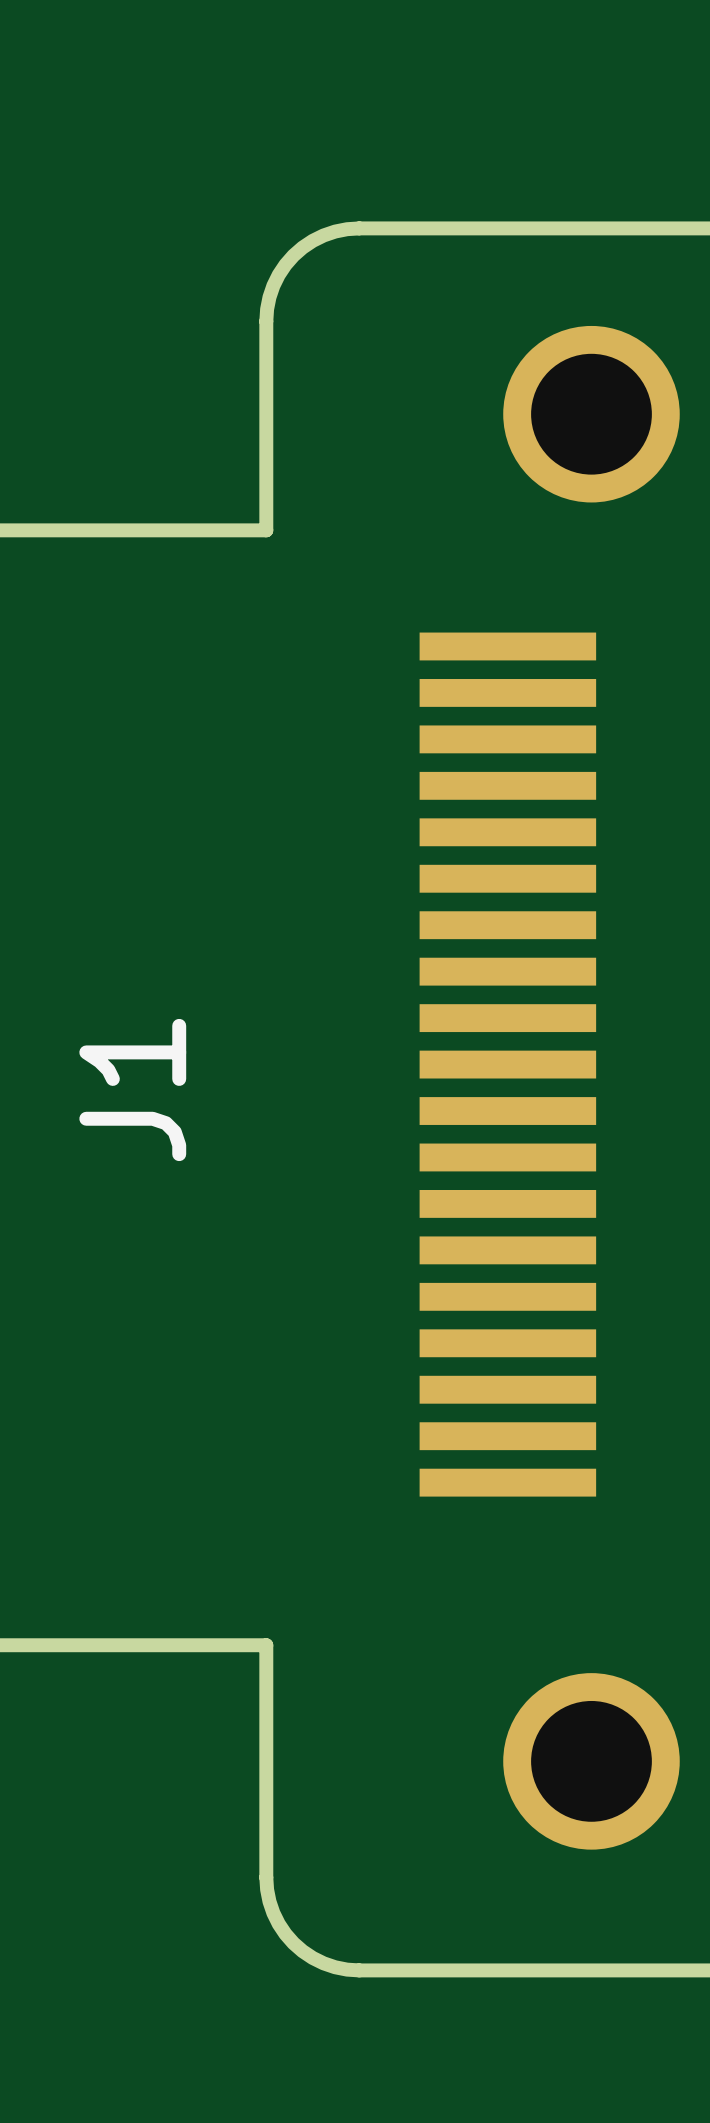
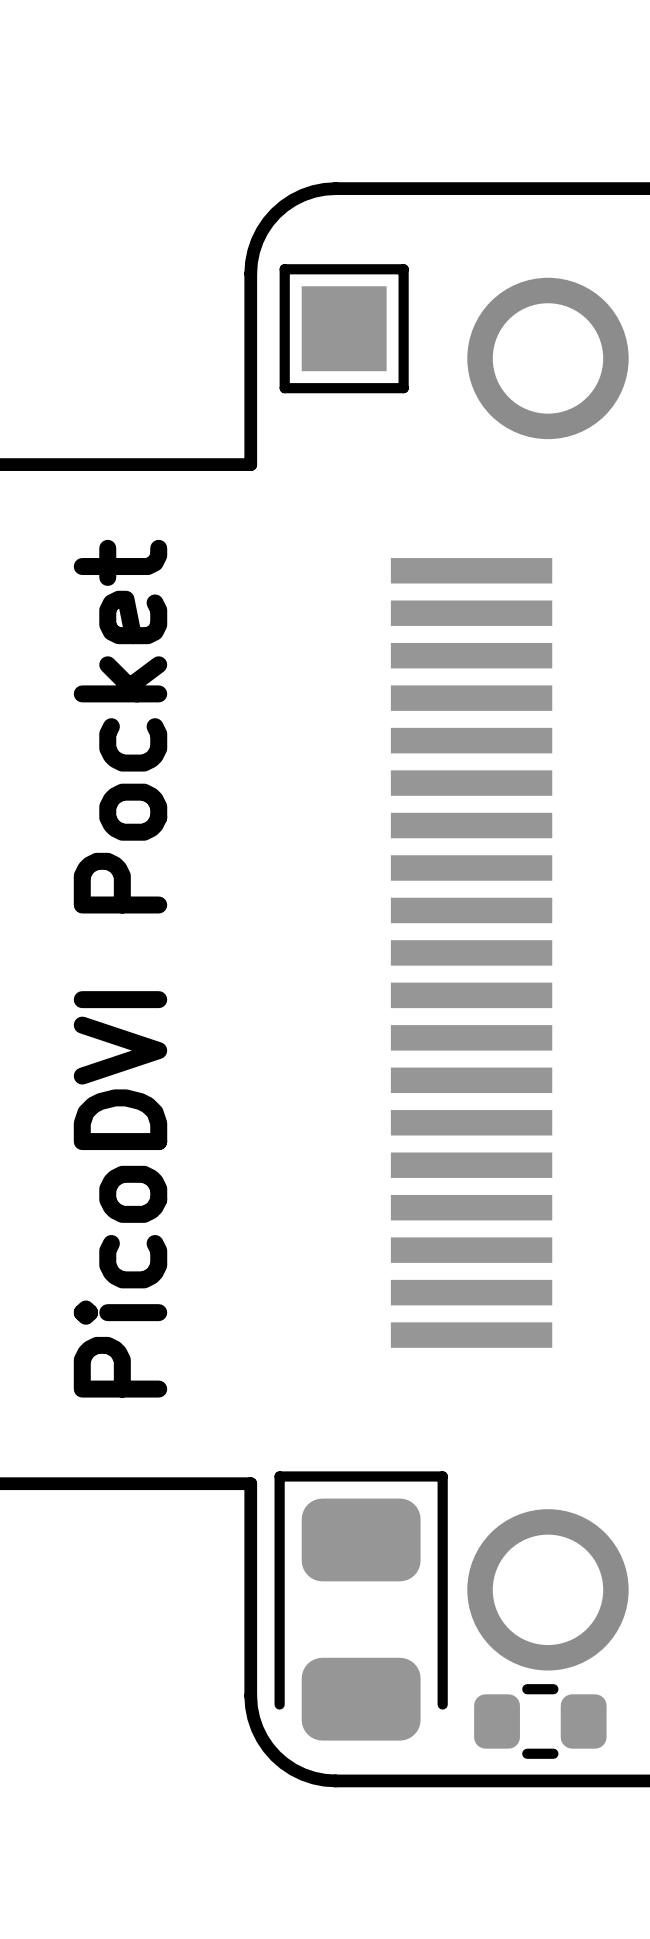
part: none -> (344, 328)
text: none -> PicoDVI Pocket (120, 968)
J1 name: J1 (132, 1090) -> none
part: none -> (361, 1605)
part: none -> (540, 1721)

